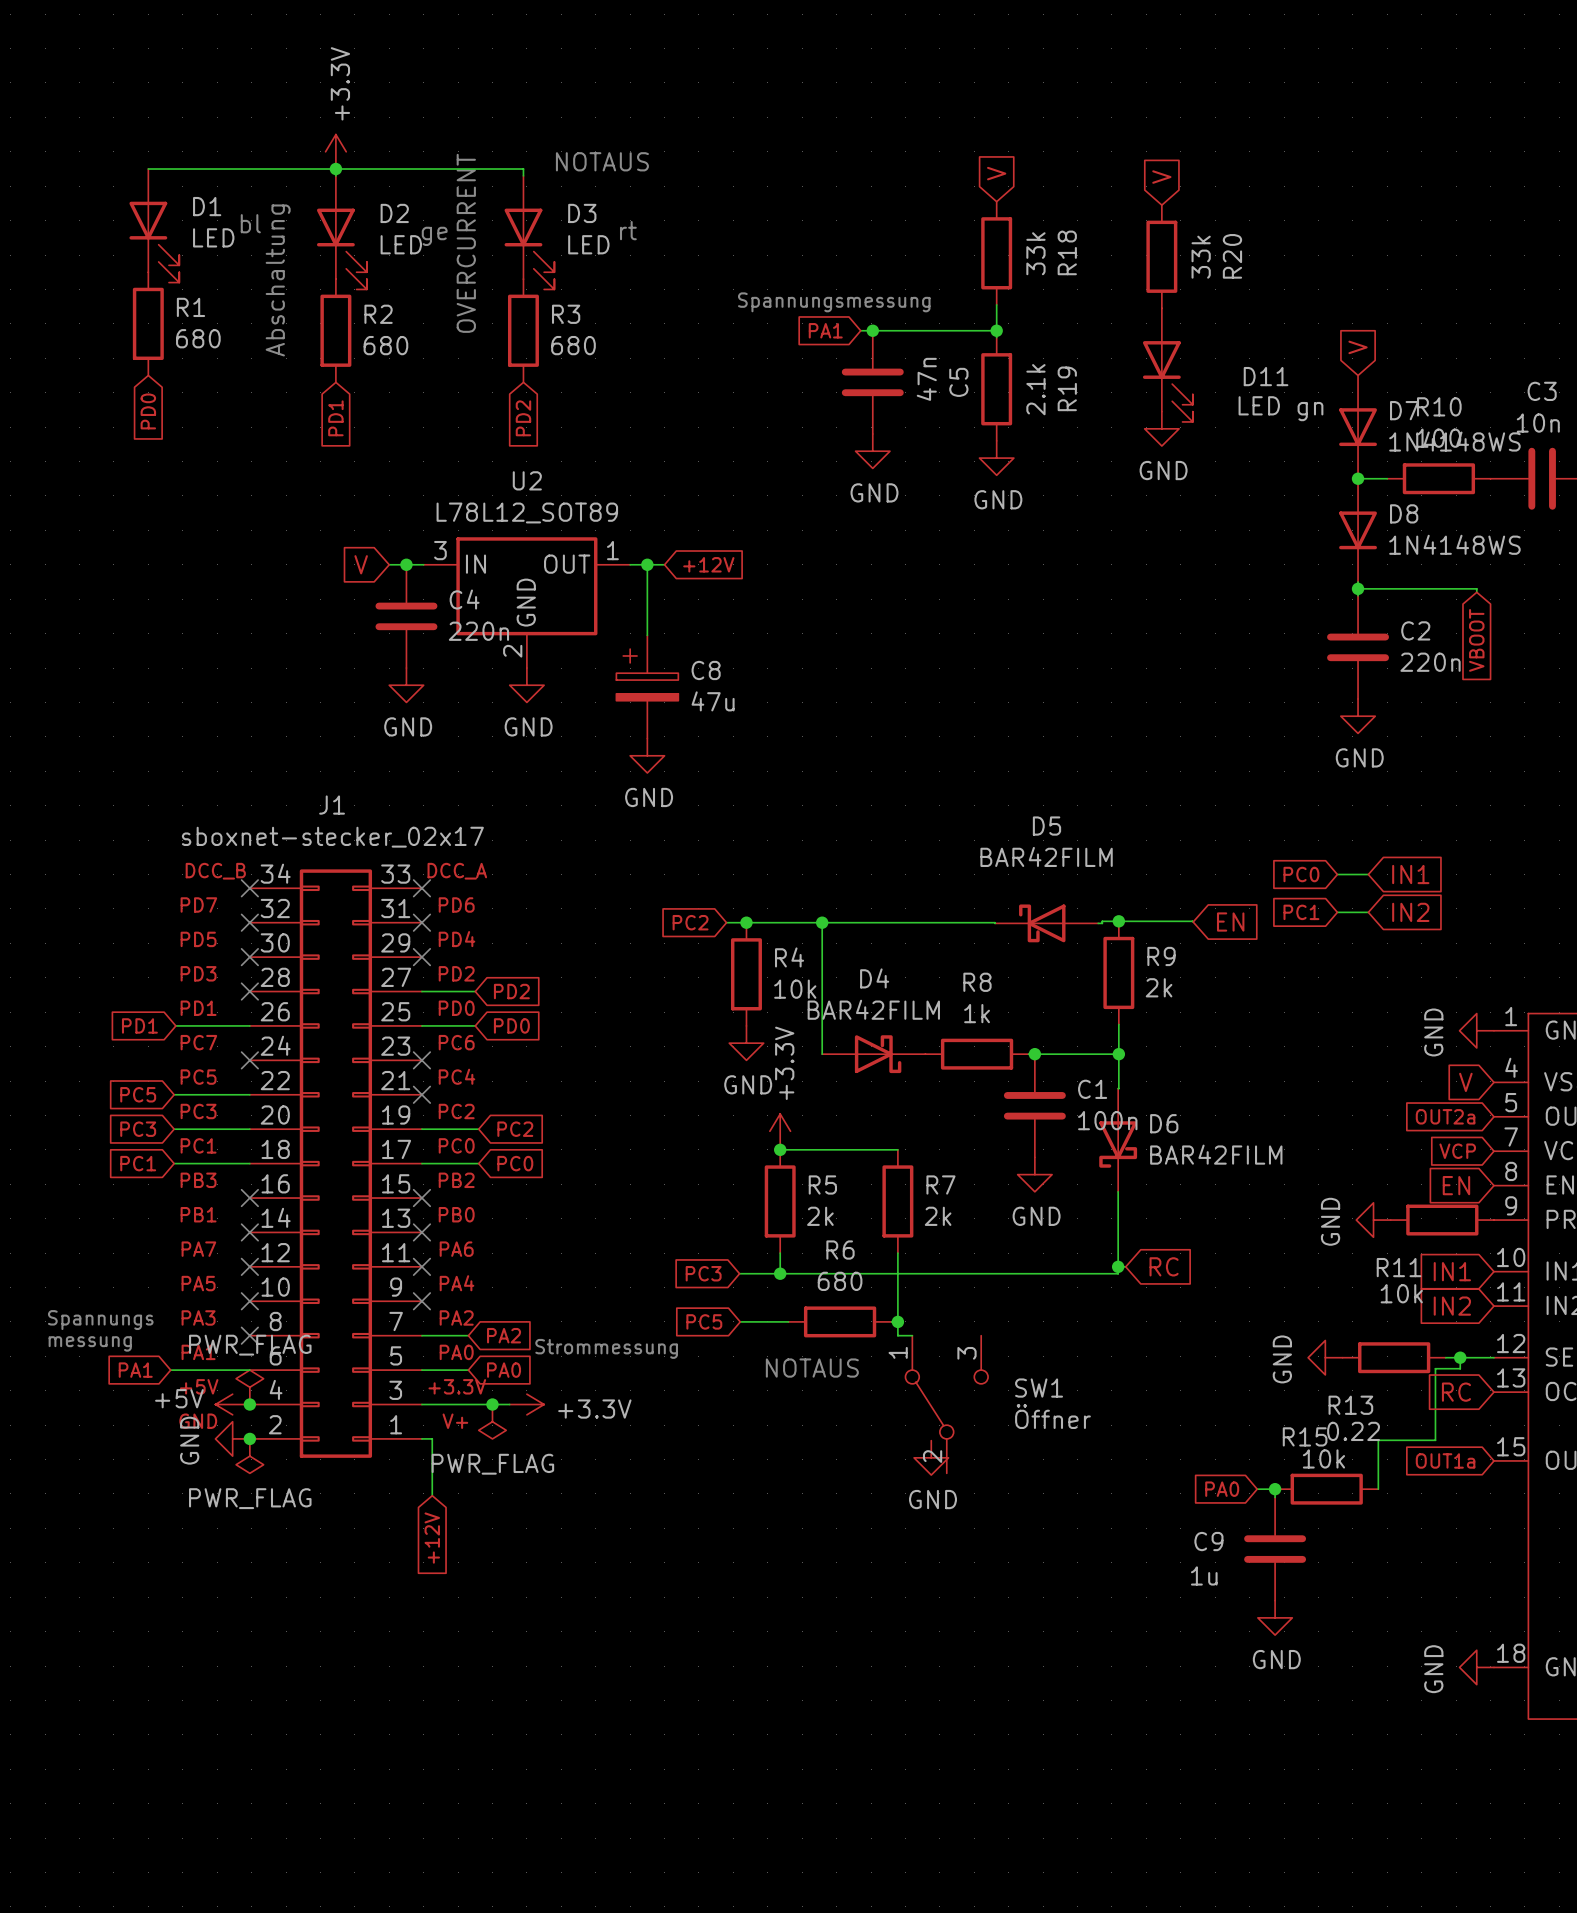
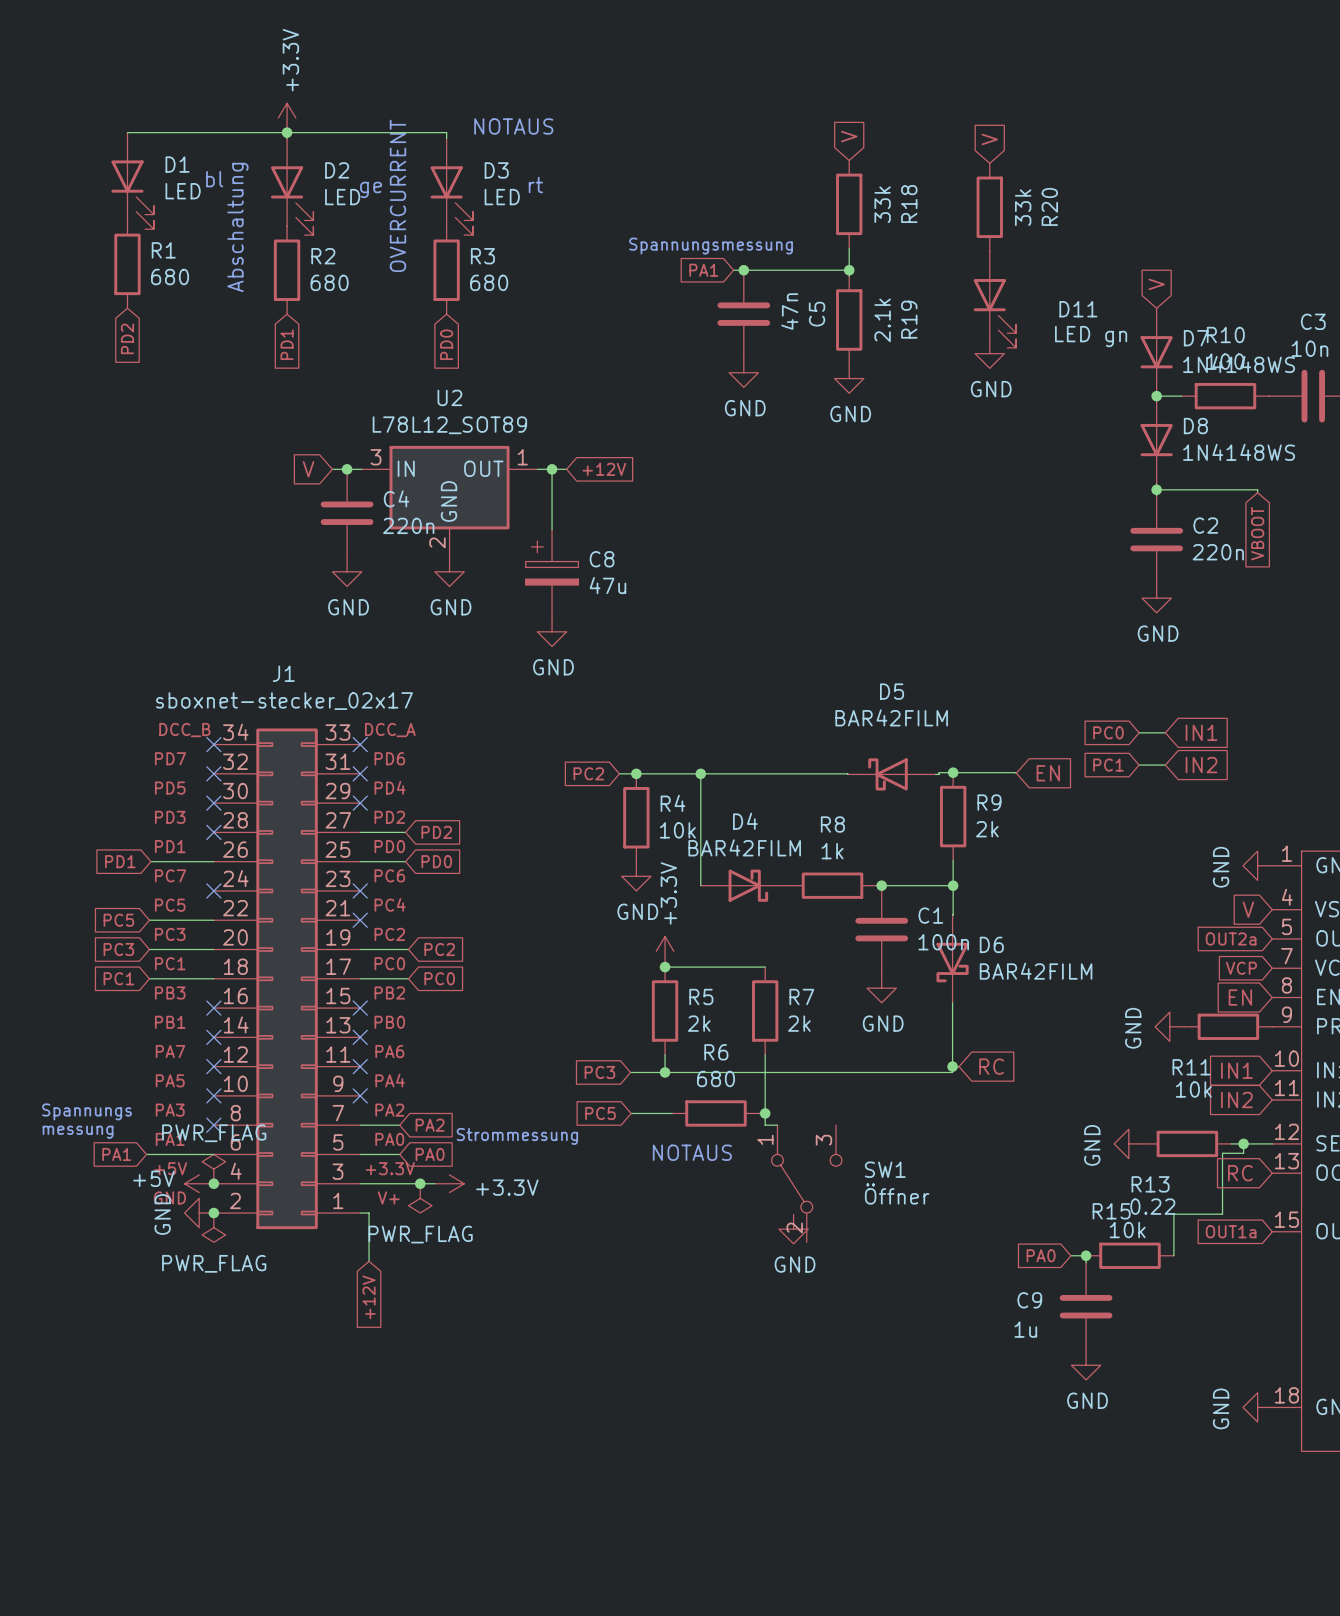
global label: PD0 (148, 411) -> PD2 (127, 338)
global label: PD2 (523, 418) -> PD0 (446, 344)

